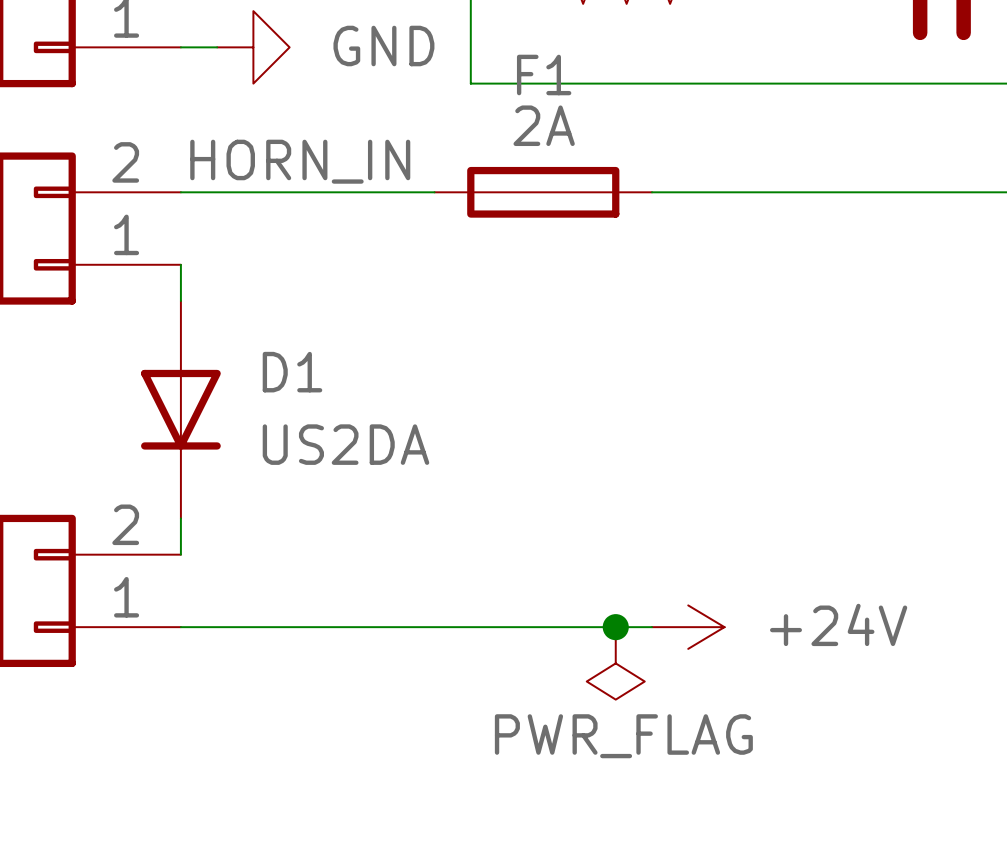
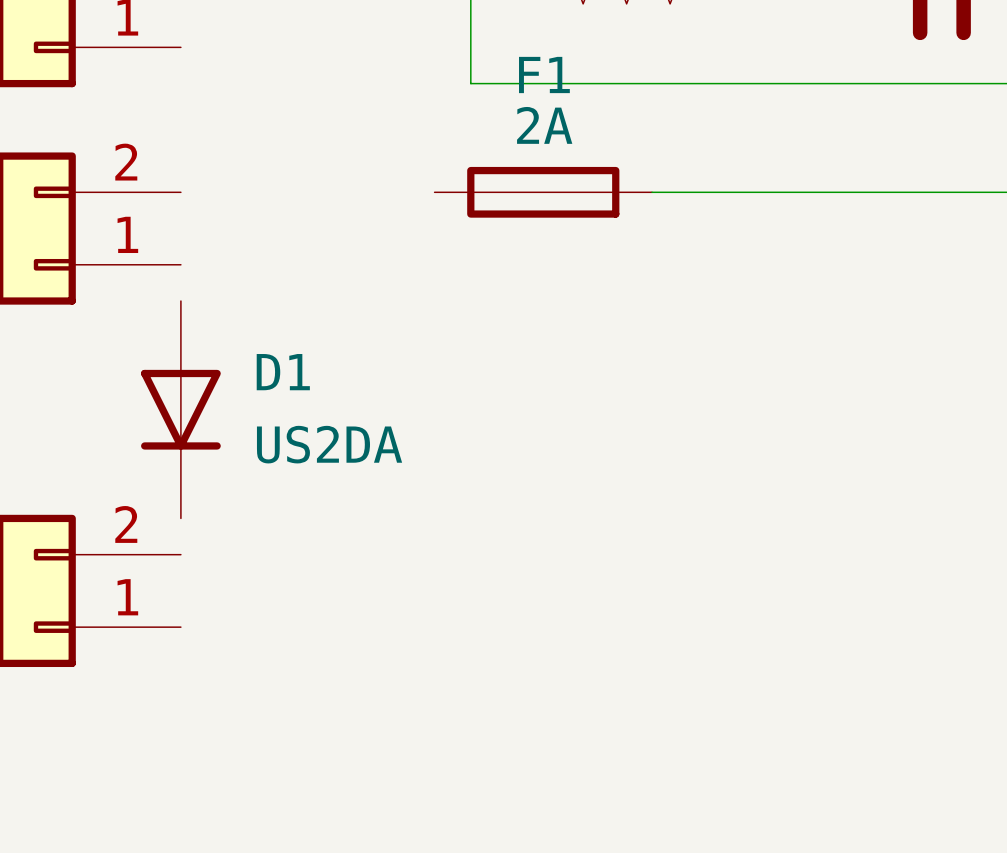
wire: (180, 47) (217, 47) -> none
power symbol: GND (253, 47) -> none
label: HORN_IN (300, 161) -> none
wire: (180, 192) (434, 192) -> none
wire: (180, 264) (180, 301) -> none
wire: (180, 518) (180, 554) -> none
wire: (180, 627) (651, 627) -> none
junction: (615, 627) -> none
power symbol: +24V (688, 627) -> none
power symbol: PWR_FLAG (615, 663) -> none

